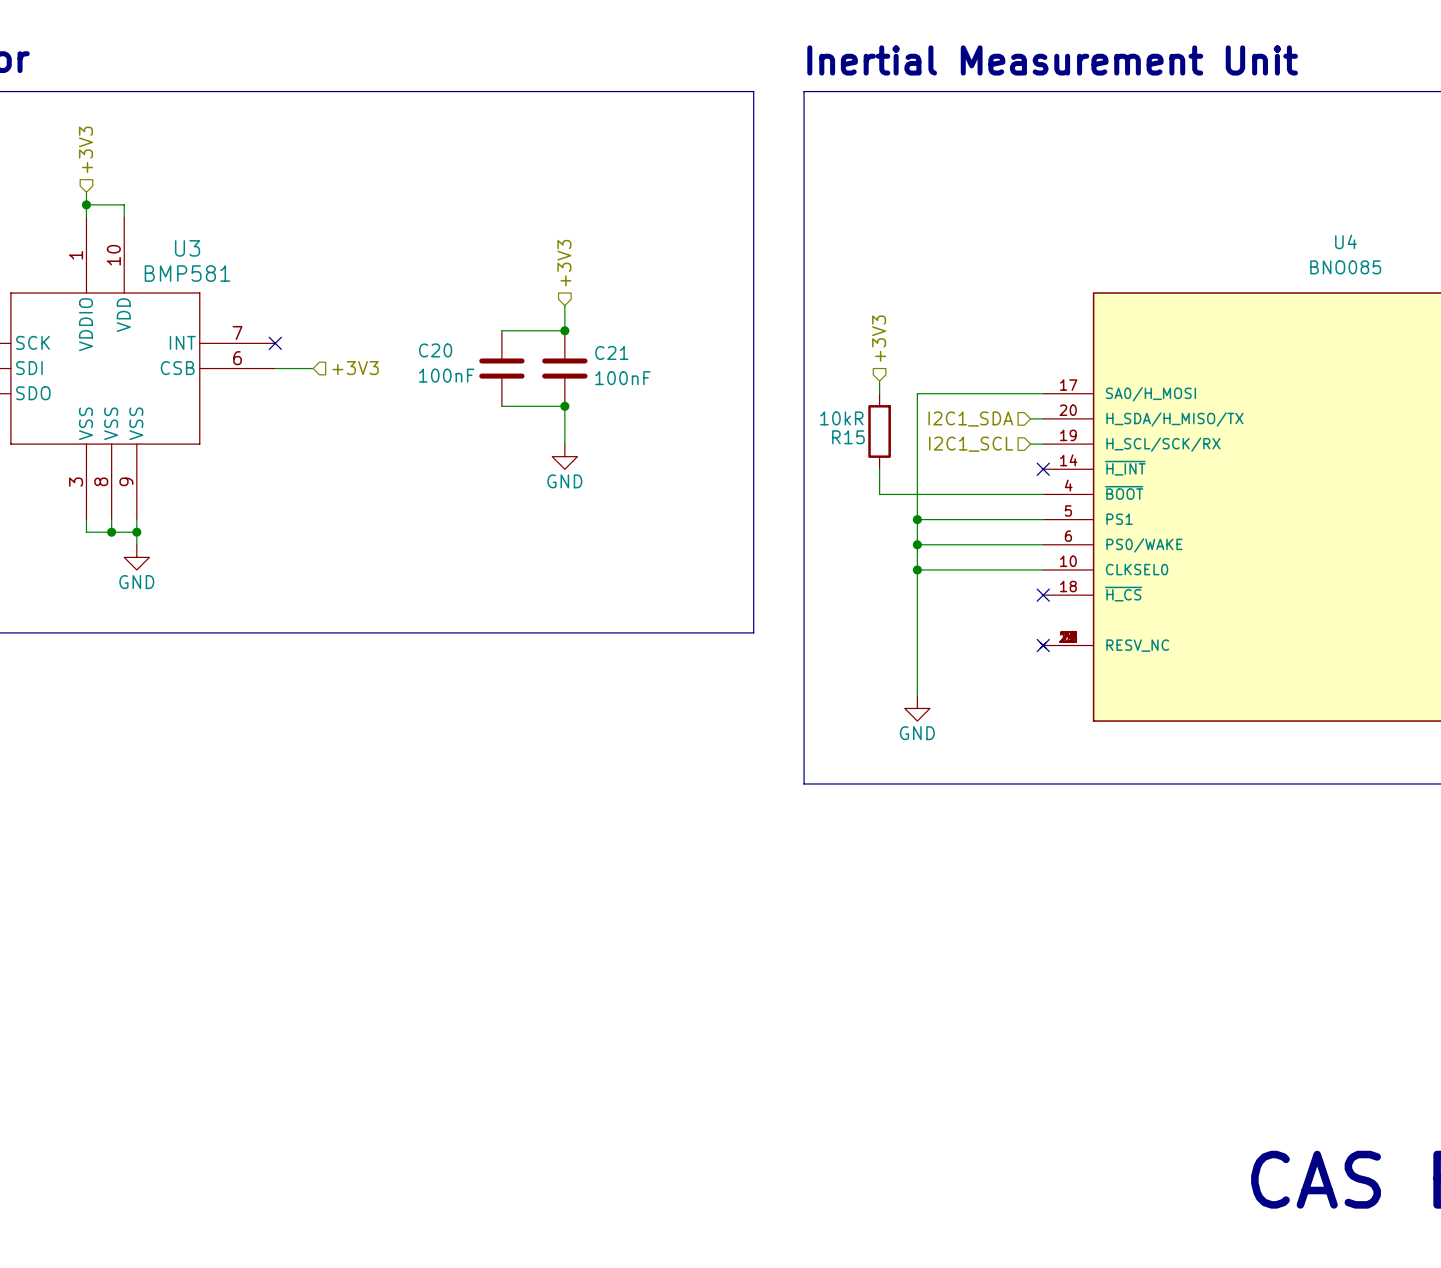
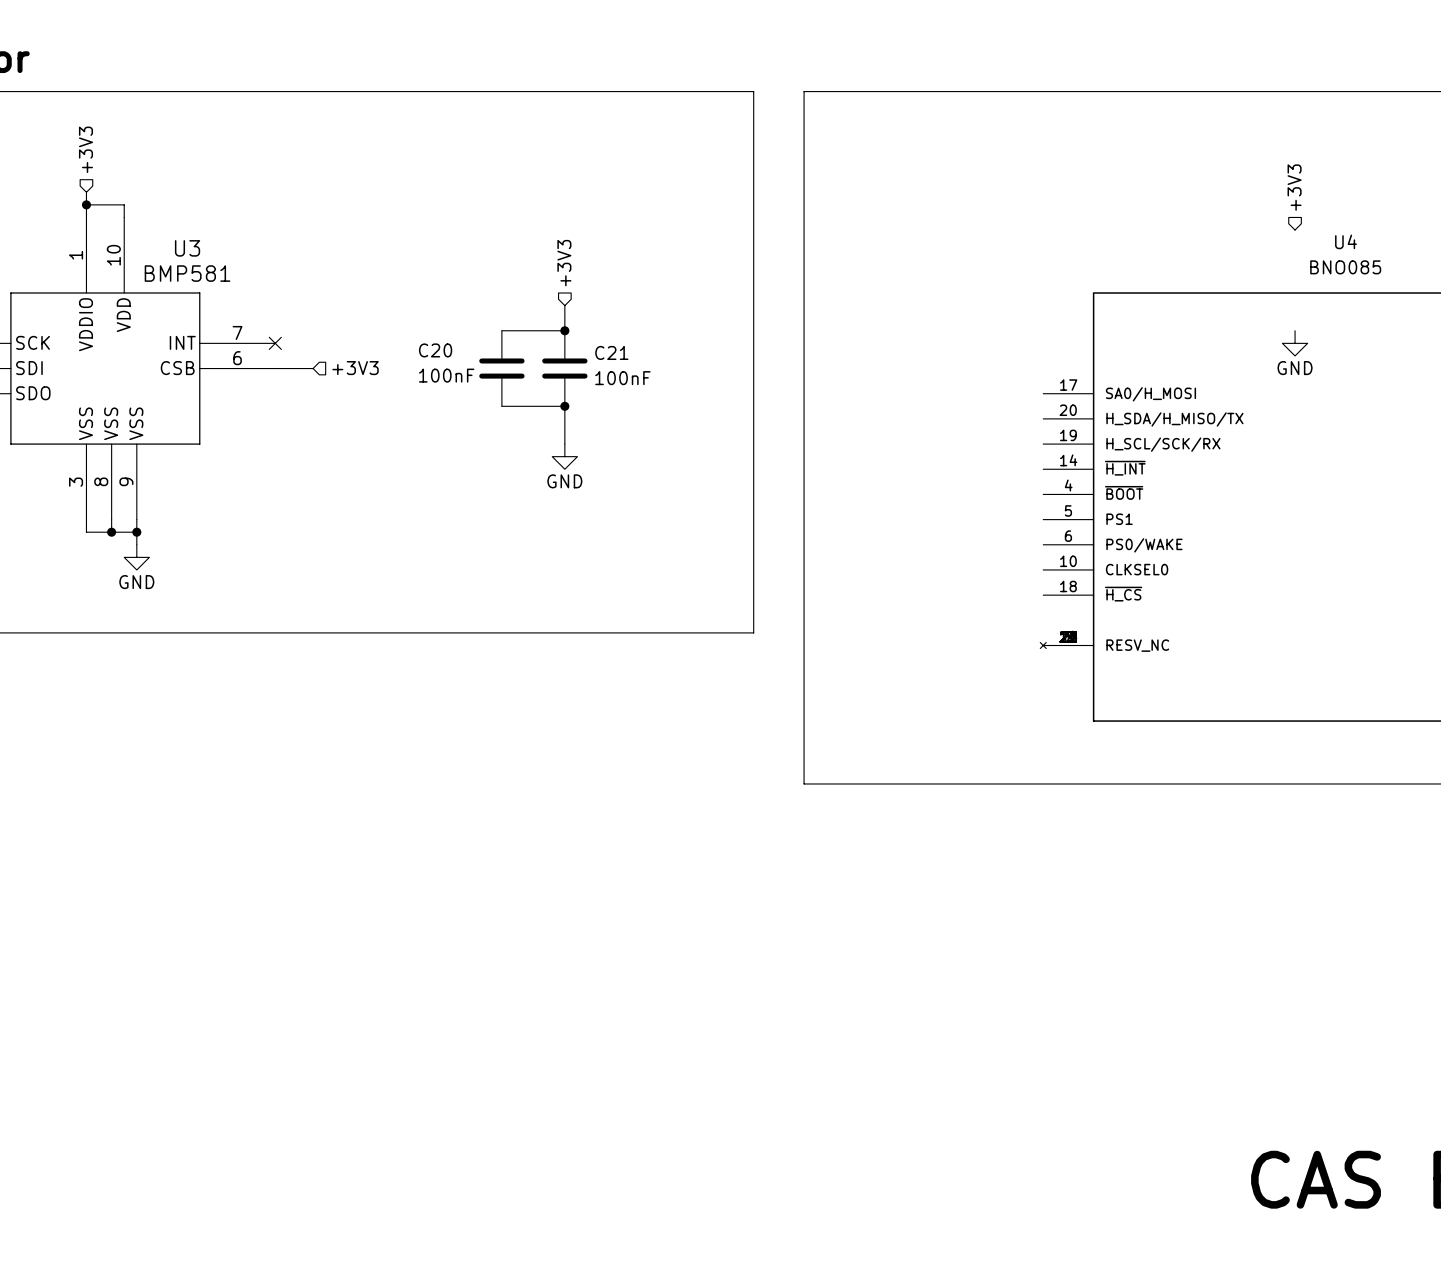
text: Inertial Measurement Unit (1052, 60) -> none
hierarchical label: none -> +3V3 (1294, 187)
hierarchical label: +3V3 (879, 338) -> none
power symbol: none -> GND (1295, 343)
wire: (879, 381) (879, 393) -> none
wire: (1043, 393) (917, 393) (917, 695) -> none
wire: (1030, 418) (1043, 418) -> none
hierarchical label: I2C1_SDA (970, 419) -> none
R15: 10kR (879, 431) -> none
hierarchical label: I2C1_SCL (971, 444) -> none
wire: (1030, 444) (1043, 444) -> none
wire: (879, 469) (879, 494) (1043, 494) -> none
no-connect mark: (1043, 469) -> none
wire: (917, 519) (1043, 519) -> none
junction: (917, 519) -> none
wire: (917, 544) (1043, 544) -> none
junction: (917, 544) -> none
wire: (917, 569) (1043, 569) -> none
junction: (917, 569) -> none
no-connect mark: (1043, 595) -> none
no-connect mark: (1043, 645) -> none
power symbol: GND (917, 708) -> none

